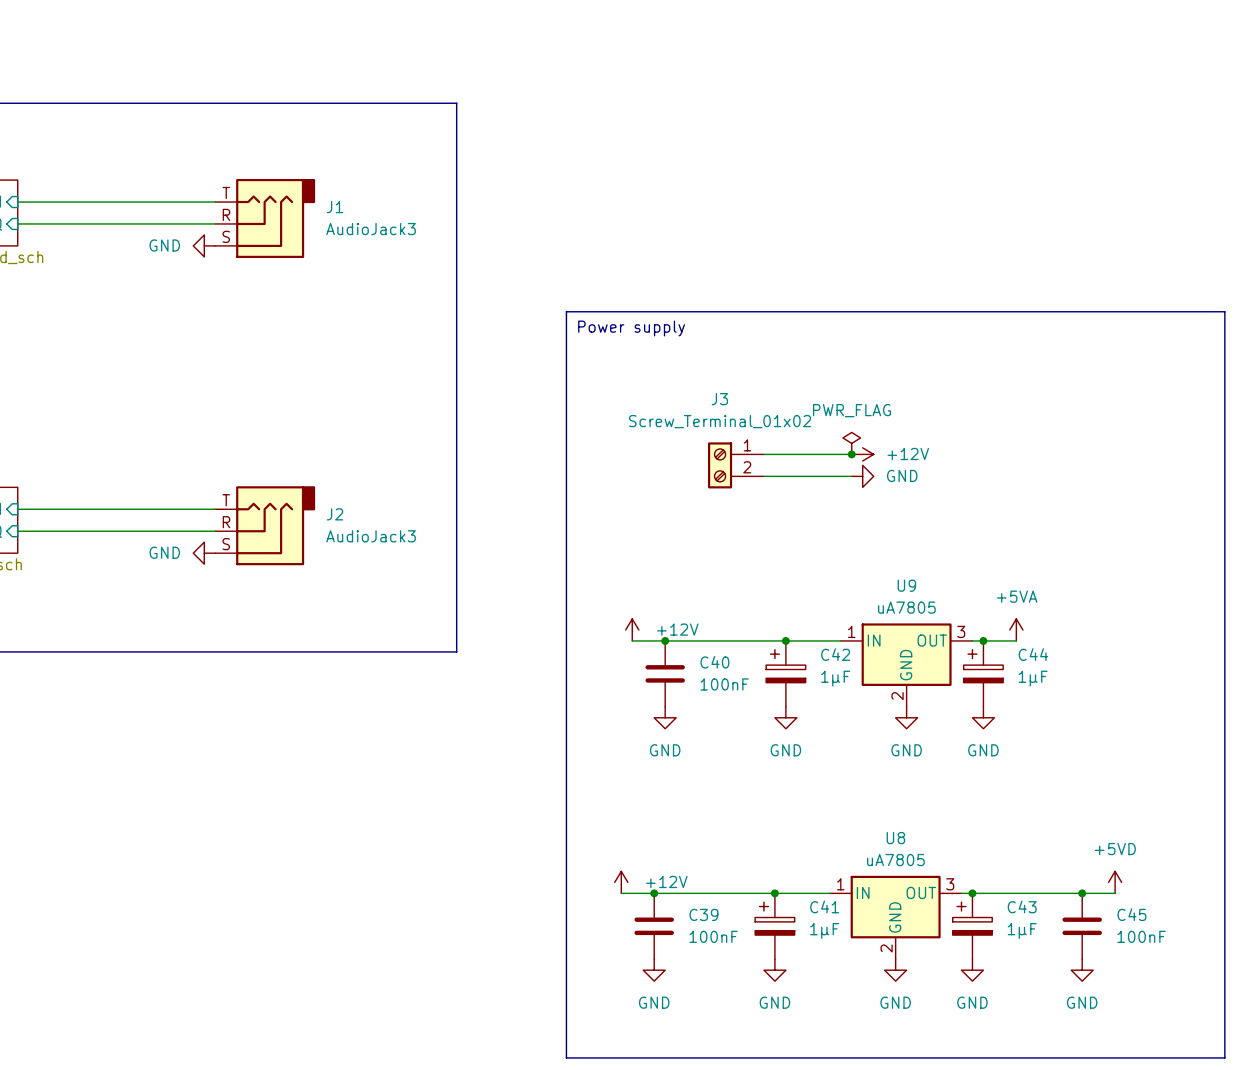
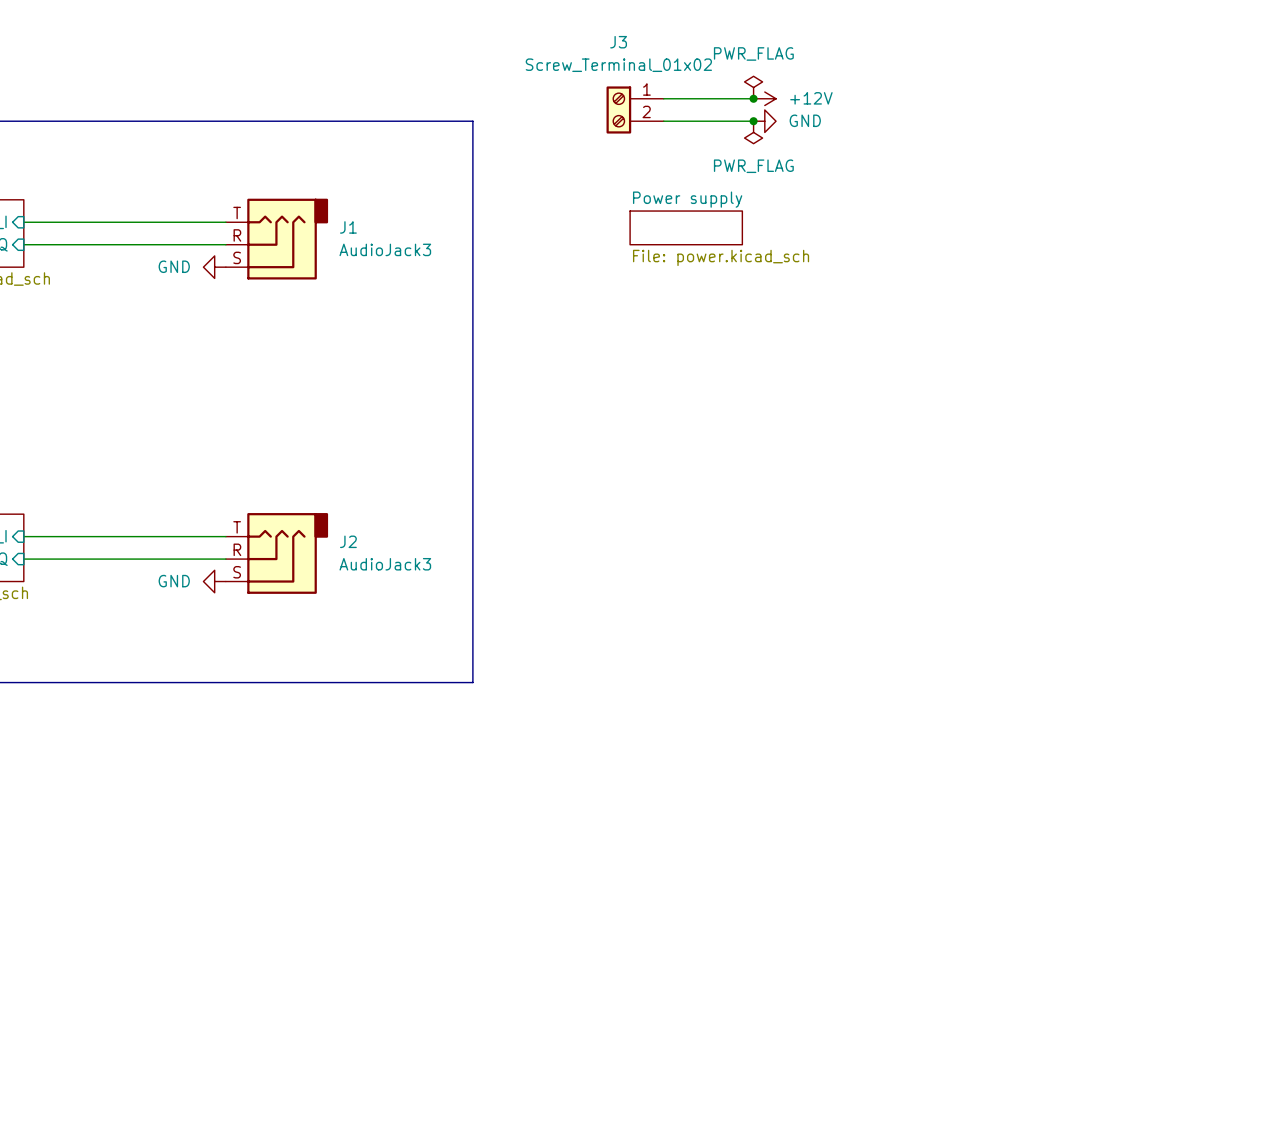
power symbol: none -> PWR_FLAG (753, 87)
wire: none -> (663, 98) (753, 98)
junction: none -> (753, 98)
power symbol: none -> +12V (764, 98)
wire: none -> (663, 121) (753, 121)
junction: none -> (753, 121)
power symbol: none -> GND (764, 121)
power symbol: none -> PWR_FLAG (753, 132)
sheet Power supply: none -> File: power.kicad_sch (686, 227)
line: (566, 311) (1224, 311) (1224, 1057) (566, 1057) (566, 311) -> none
text: Power supply (631, 328) -> none
power symbol: PWR_FLAG (851, 443) -> none
wire: (763, 454) (851, 454) -> none
junction: (851, 454) -> none
power symbol: +12V (862, 454) -> none
J3 position: (735, 465) -> (635, 109)
wire: (763, 476) (851, 476) -> none
power symbol: GND (862, 476) -> none
power symbol: +12V (632, 629) -> none
power symbol: +5VA (1016, 629) -> none
wire: (632, 640) (840, 640) -> none
junction: (665, 640) -> none
junction: (785, 640) -> none
wire: (972, 640) (1016, 640) -> none
junction: (983, 640) -> none
U9: uA7805 (906, 665) -> none
C40: 100nF (665, 673) -> none
C42: 1µF (785, 673) -> none
C44: 1µF (983, 673) -> none
power symbol: GND (665, 717) -> none
power symbol: GND (785, 717) -> none
power symbol: GND (906, 717) -> none
power symbol: GND (983, 717) -> none
power symbol: +12V (621, 882) -> none
power symbol: +5VD (1115, 882) -> none
wire: (621, 893) (829, 893) -> none
junction: (654, 893) -> none
junction: (774, 893) -> none
wire: (961, 893) (1115, 893) -> none
junction: (972, 893) -> none
junction: (1082, 893) -> none
U8: uA7805 (895, 917) -> none
C39: 100nF (654, 926) -> none
C41: 1µF (774, 926) -> none
C43: 1µF (972, 926) -> none
C45: 100nF (1082, 926) -> none
power symbol: GND (654, 970) -> none
power symbol: GND (774, 970) -> none
power symbol: GND (895, 970) -> none
power symbol: GND (972, 970) -> none
power symbol: GND (1082, 970) -> none

